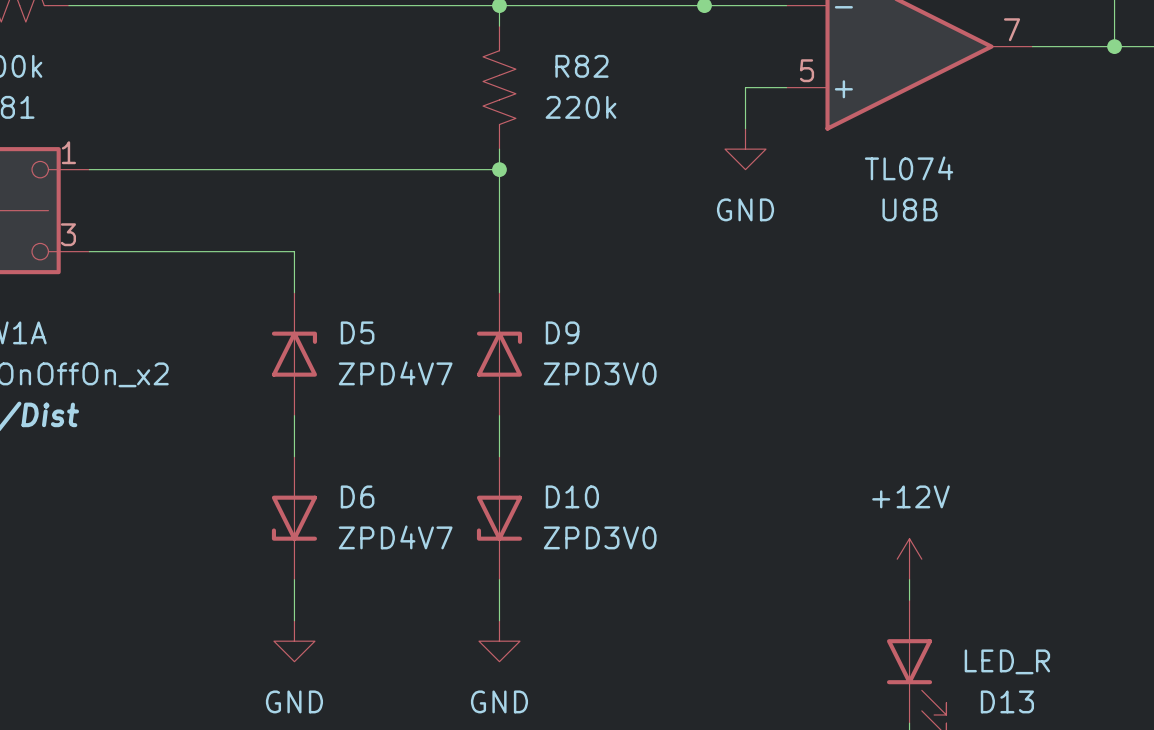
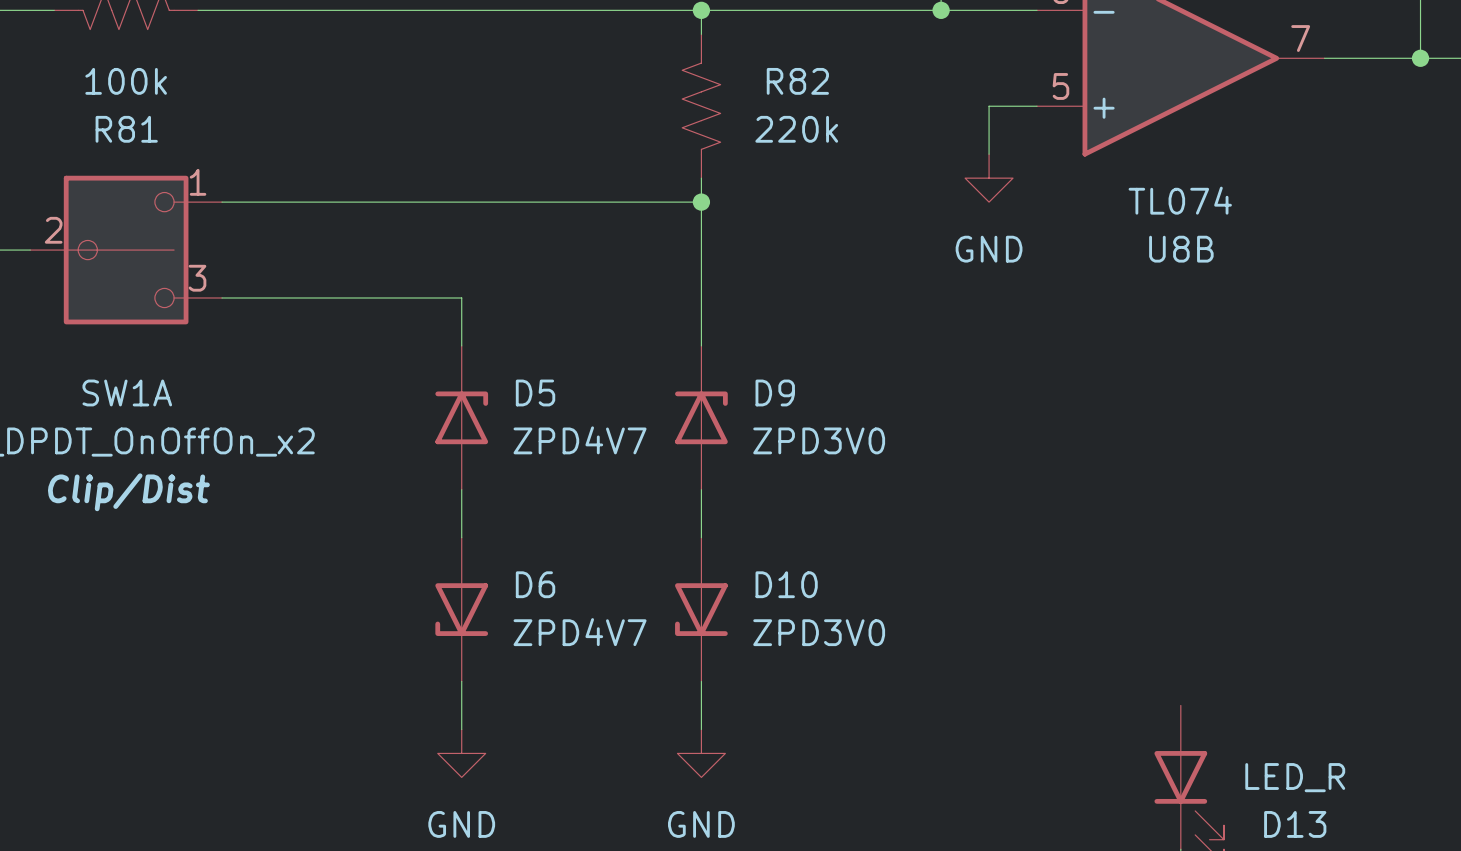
power symbol: +12V (909, 559) -> none
wire: (909, 579) (909, 600) -> none

